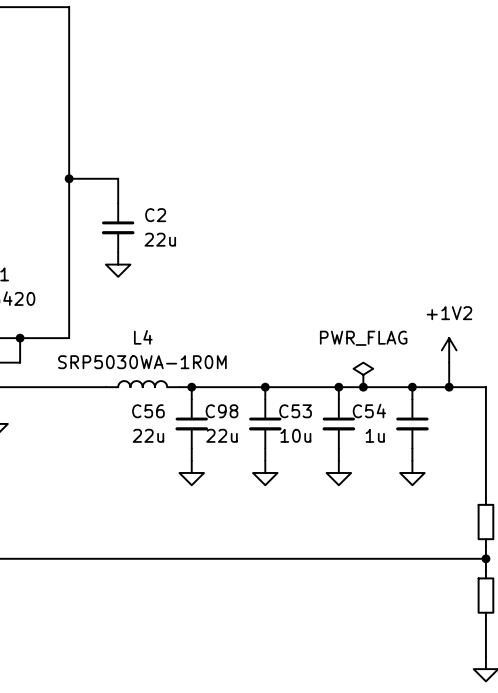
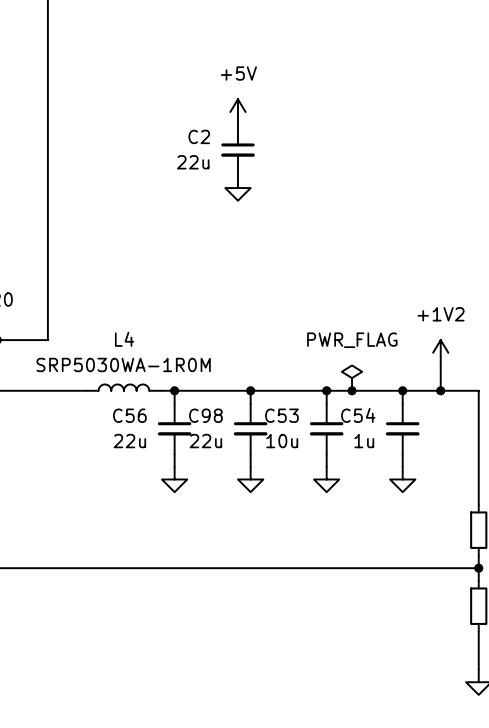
power symbol: none -> +5V (237, 112)
wire: (69, 178) (118, 178) (118, 203) -> none
junction: (69, 178) -> none
C2 name position: C2 (155, 215) -> C2 (199, 136)
C2 position: (118, 227) -> (237, 150)
C2 value position: 22u (160, 239) -> 22u (193, 162)
power symbol position: (118, 264) -> (237, 188)

